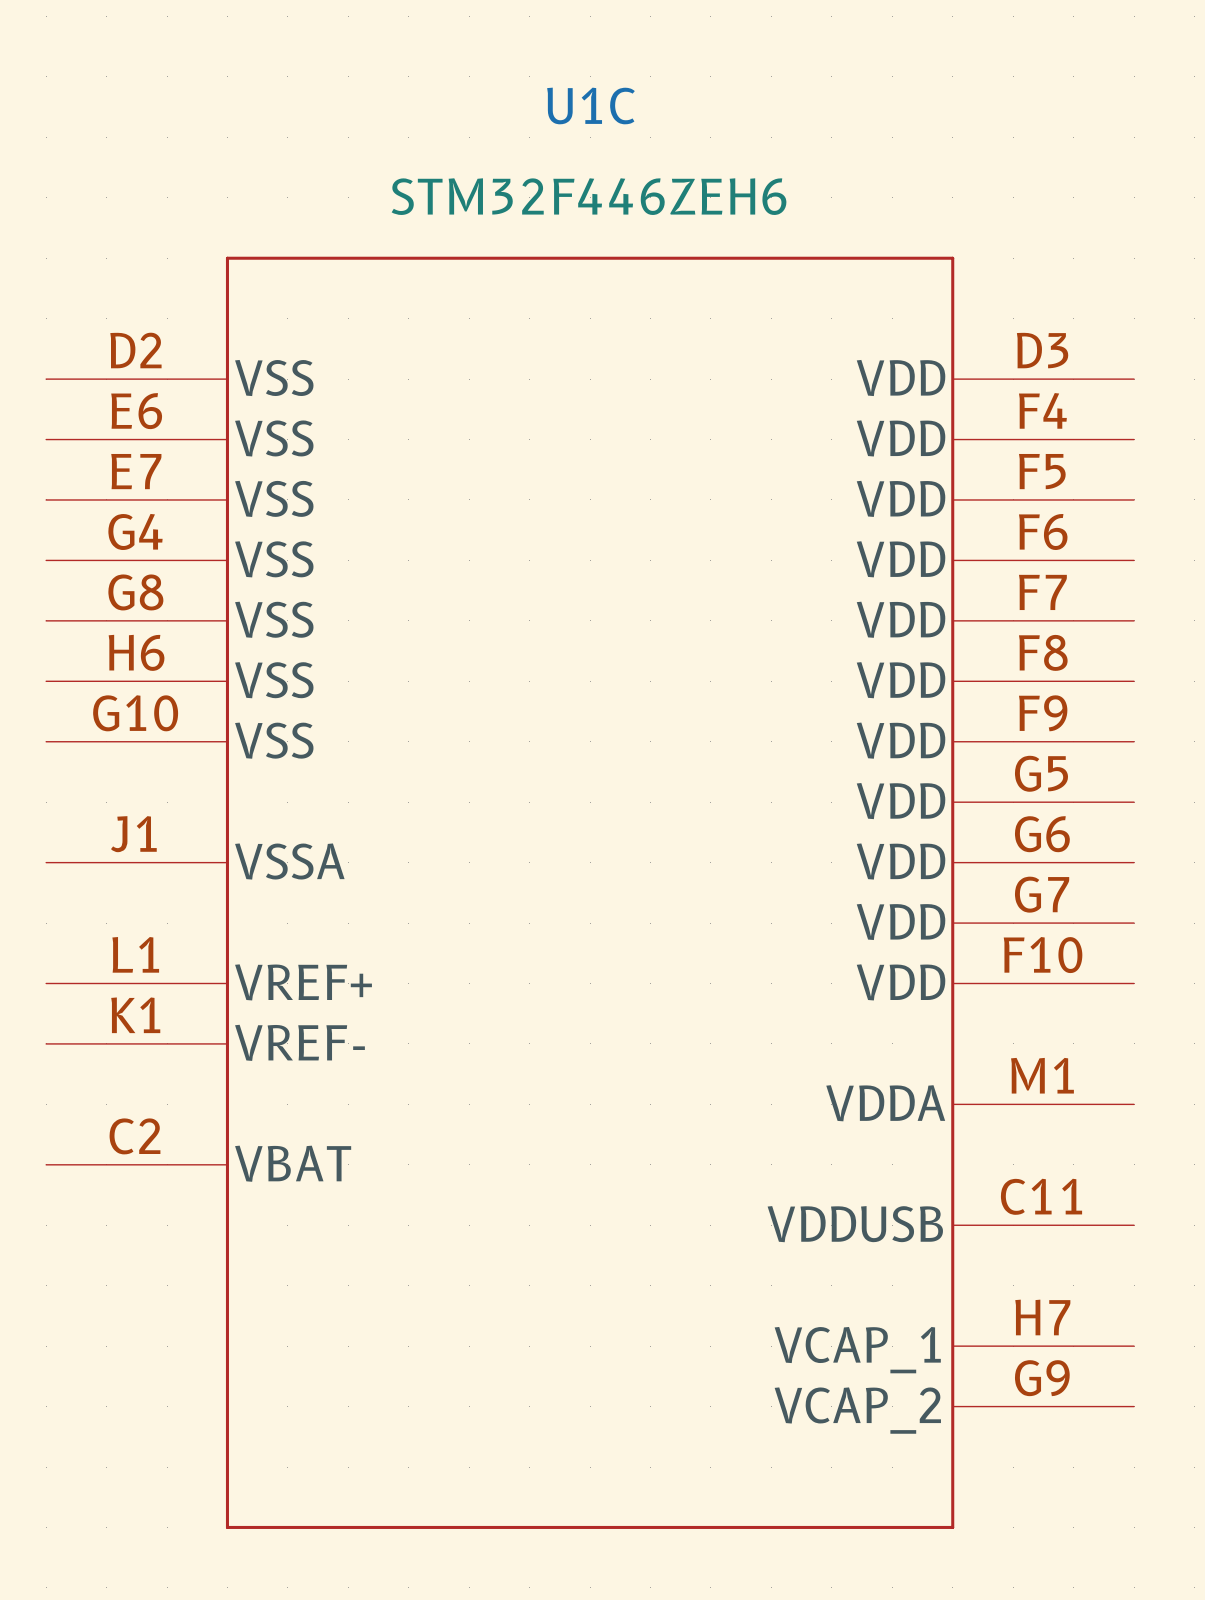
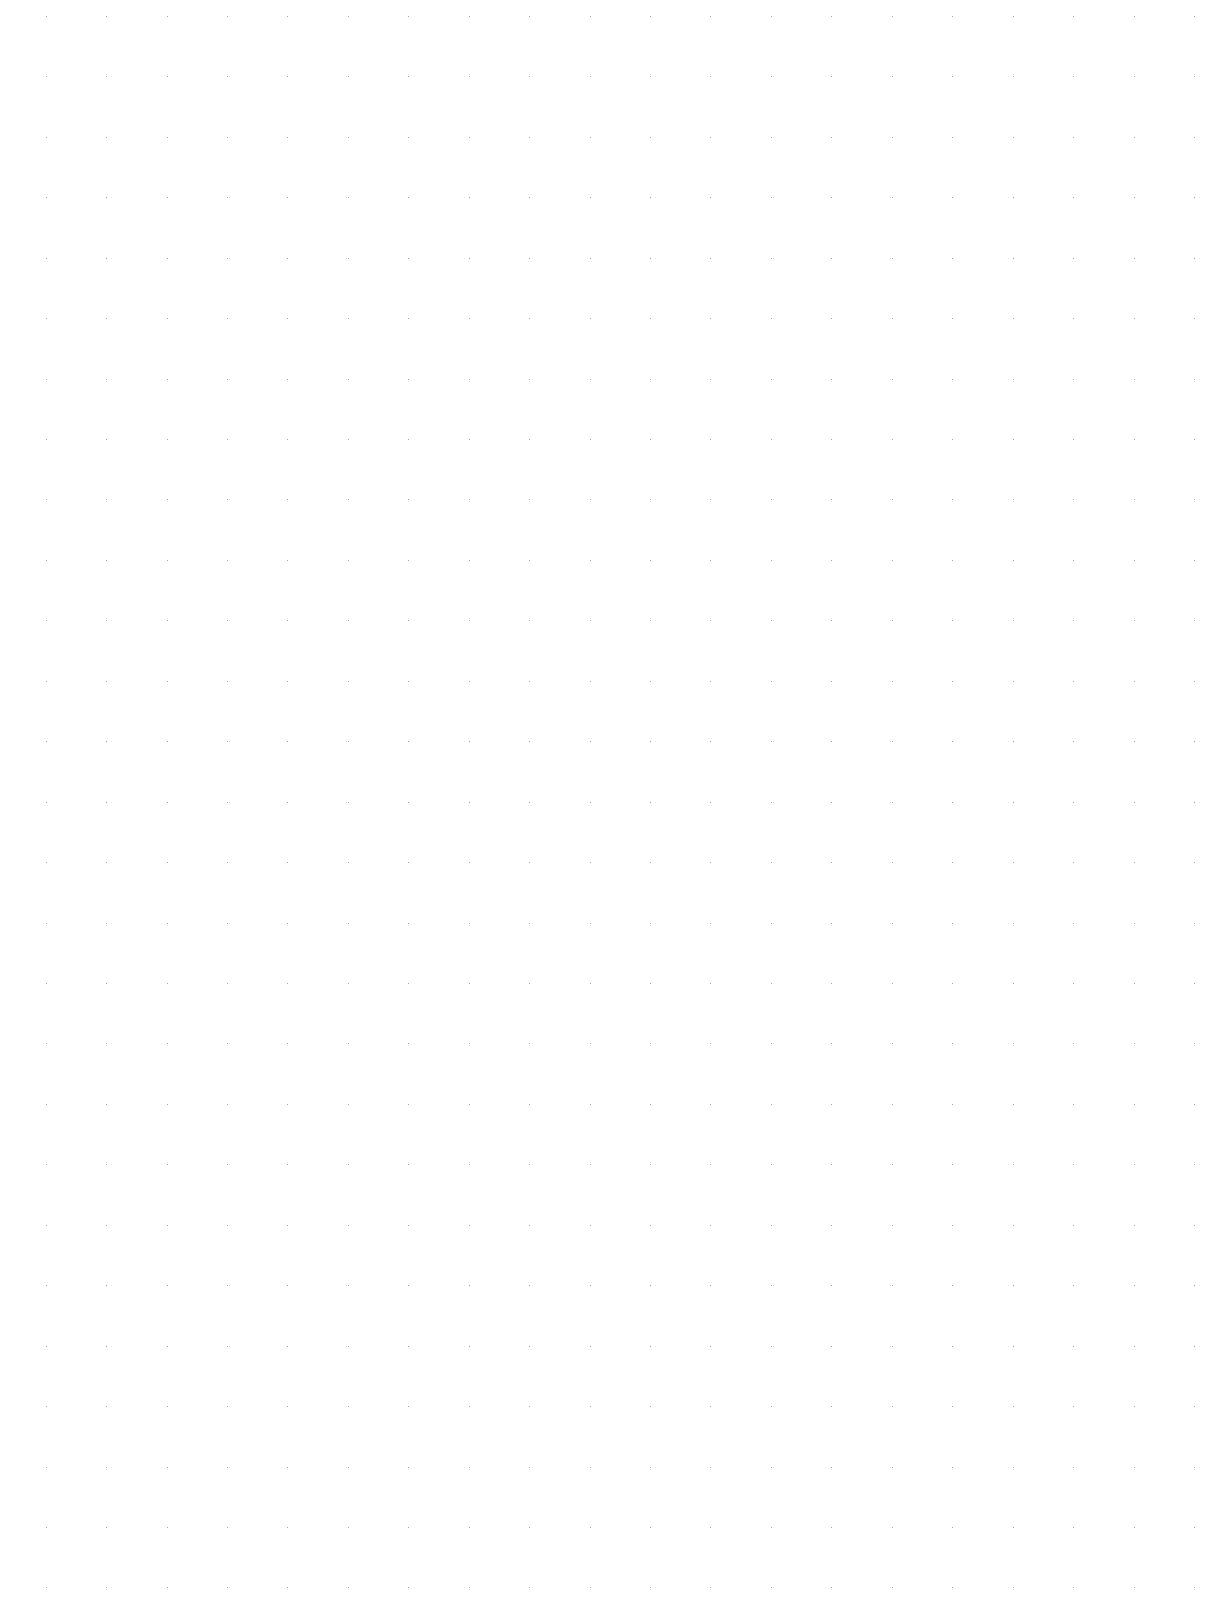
U1C: STM32F446ZEH6 (590, 892) -> none

